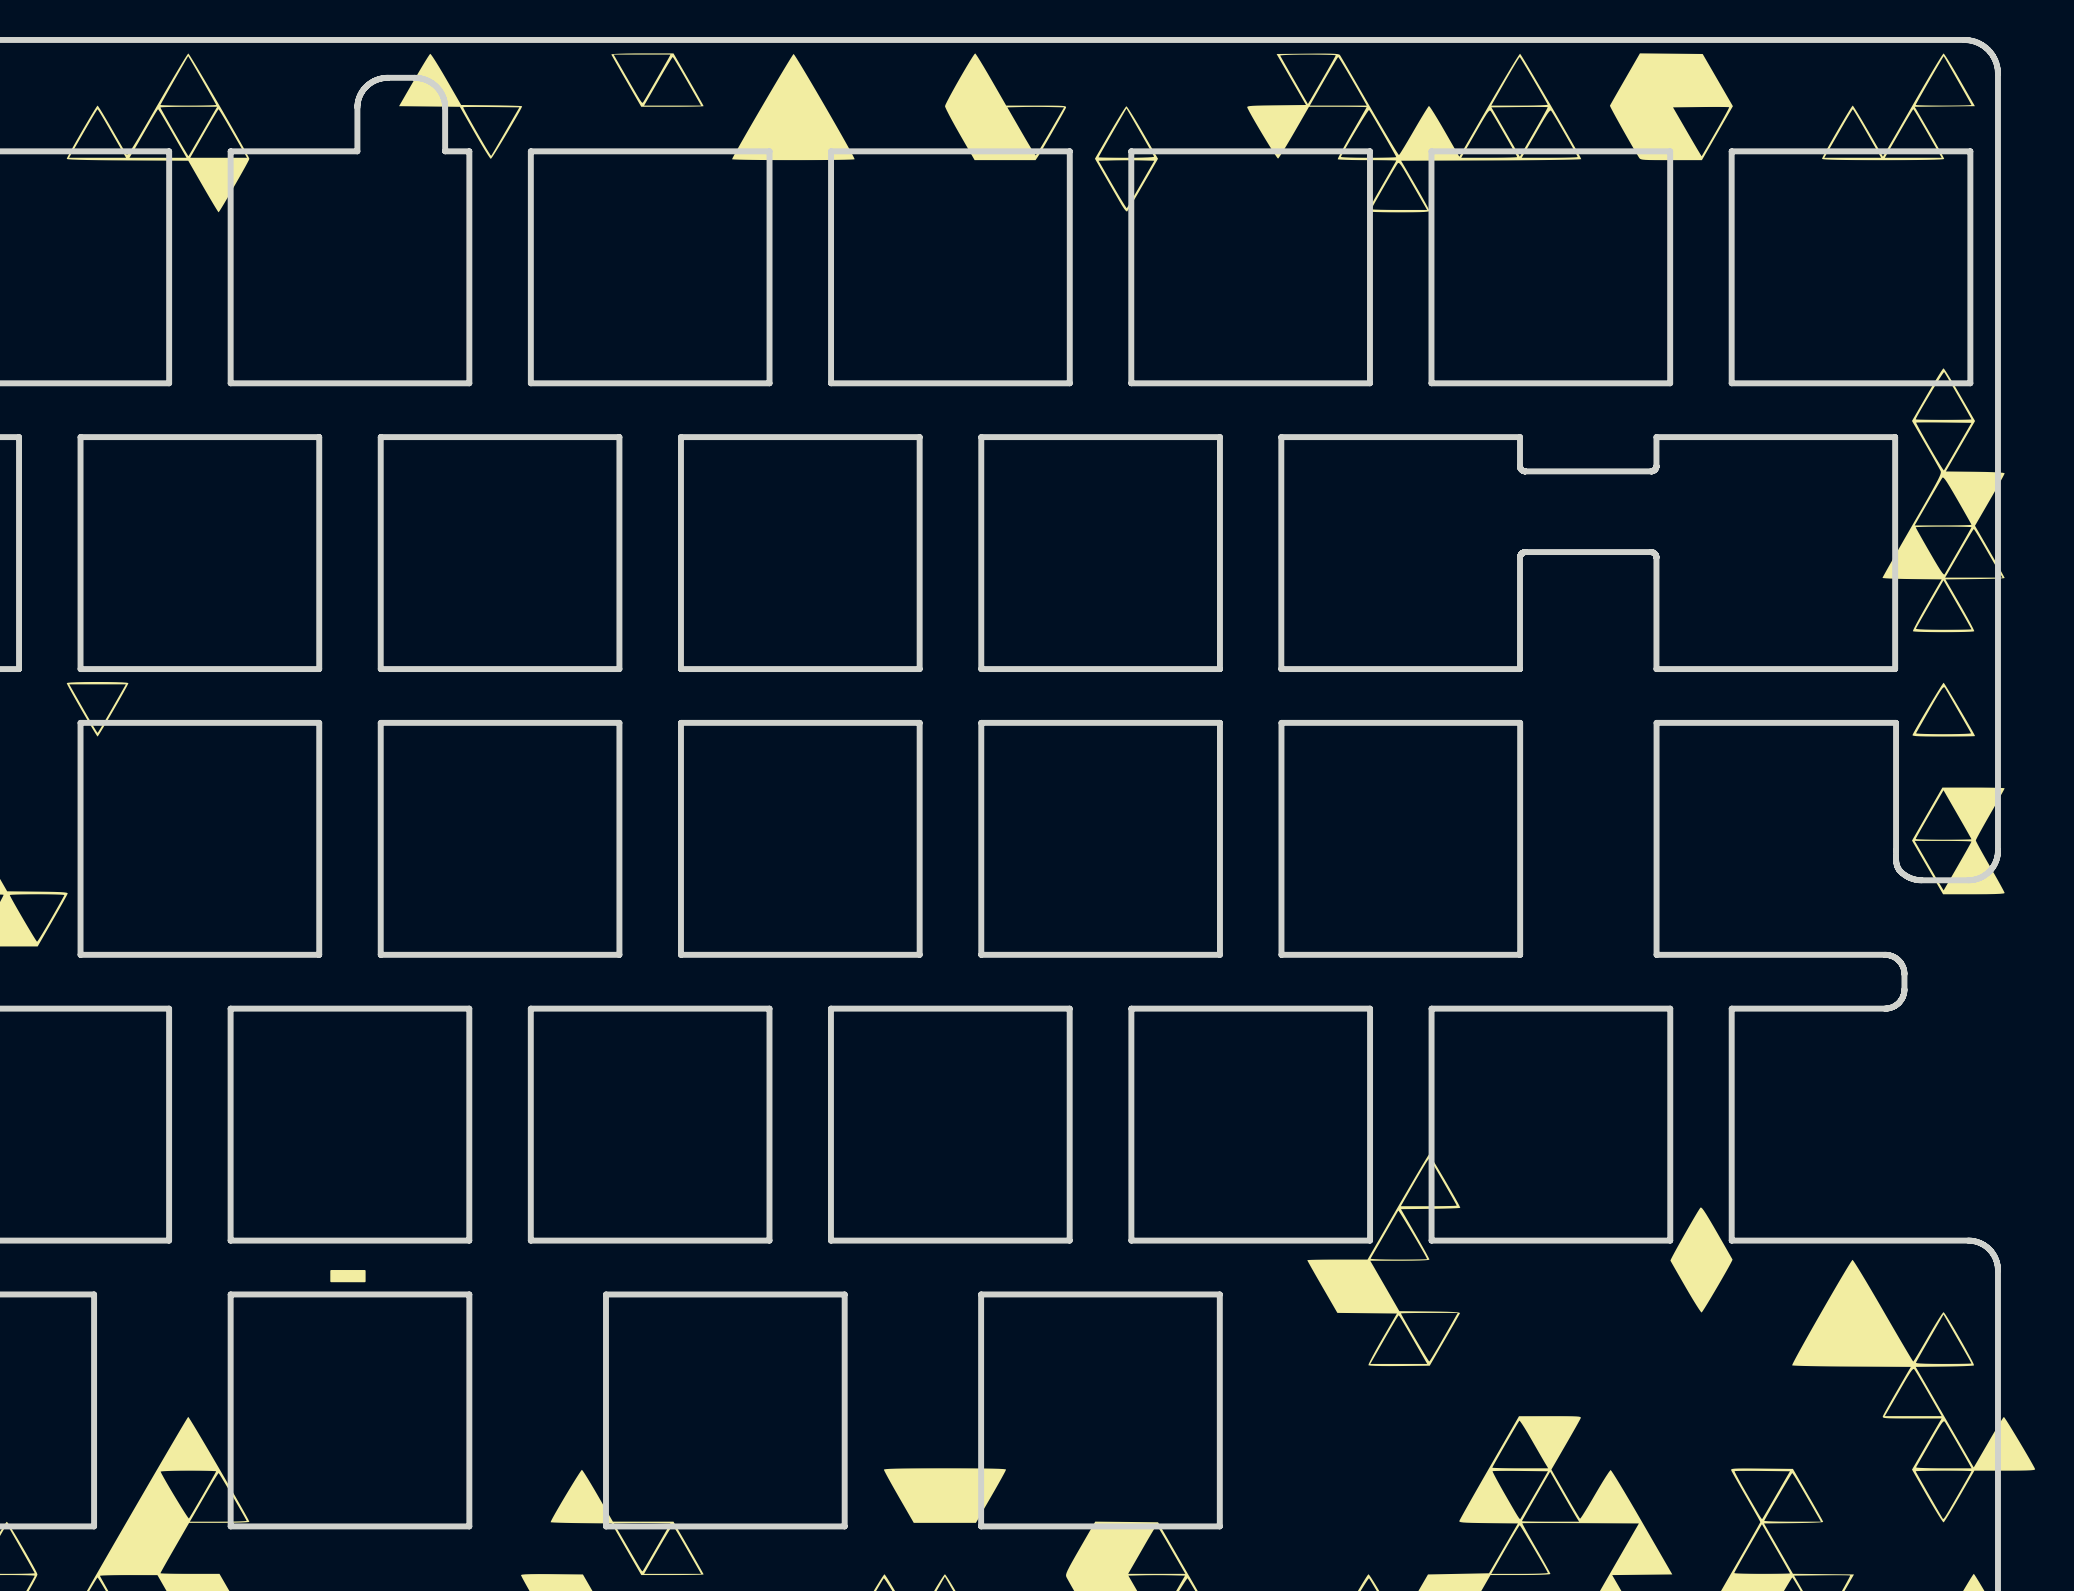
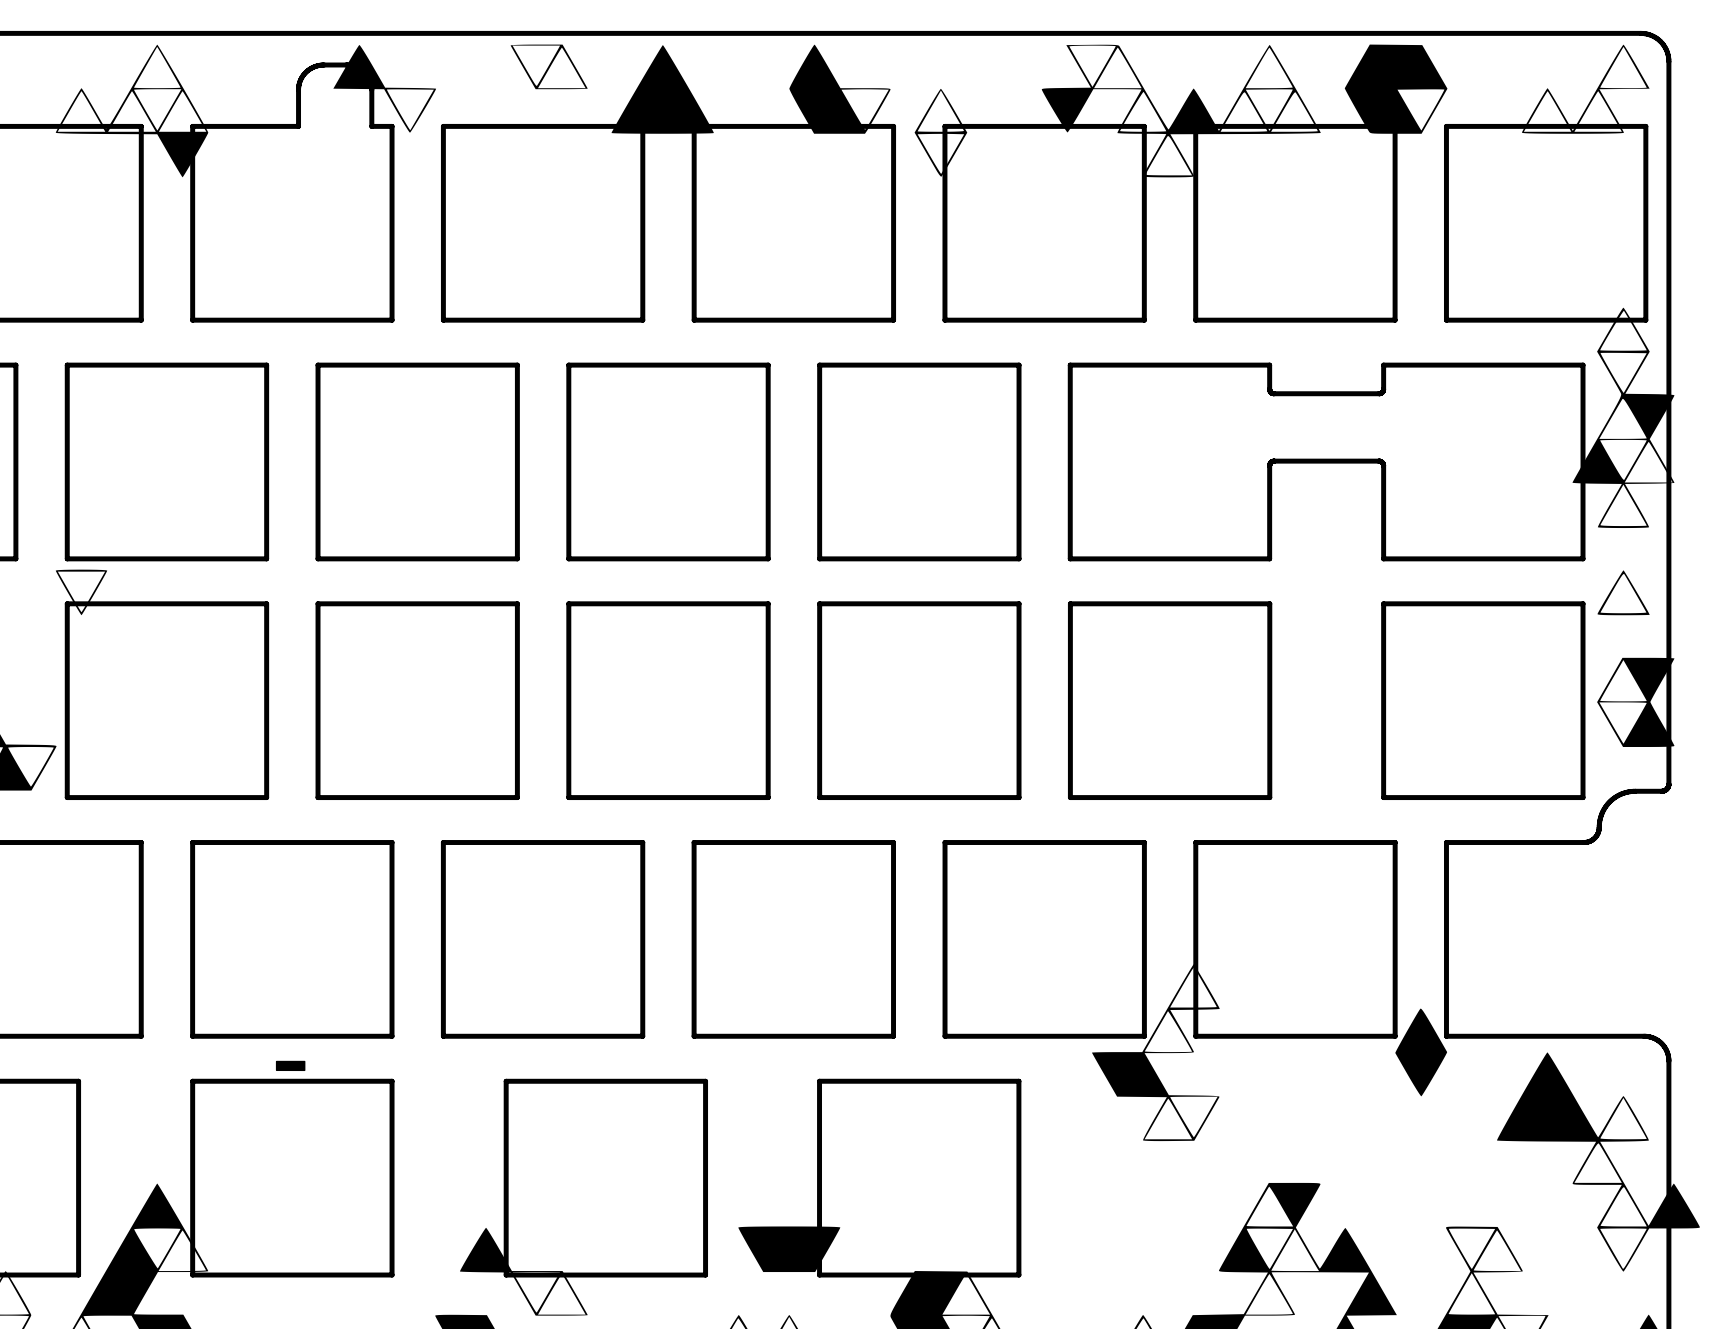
board edge: none -> (1383, 603) (1383, 797) (1583, 797) (1583, 603) (1383, 603)
board edge: (1997, 850) (1996, 860) (1991, 869) (1983, 875) (1974, 879) (1918, 880) (1907, 876) (1899, 870) (1895, 857) (1896, 722) (1656, 722) (1656, 954) (1889, 955) (1898, 959) (1902, 966) (1904, 991) (1898, 1003) (1885, 1008) -> (1668, 710) (1667, 788) (1662, 791) (1629, 791) (1616, 796) (1603, 810) (1595, 837) (1587, 842) (1574, 842)

